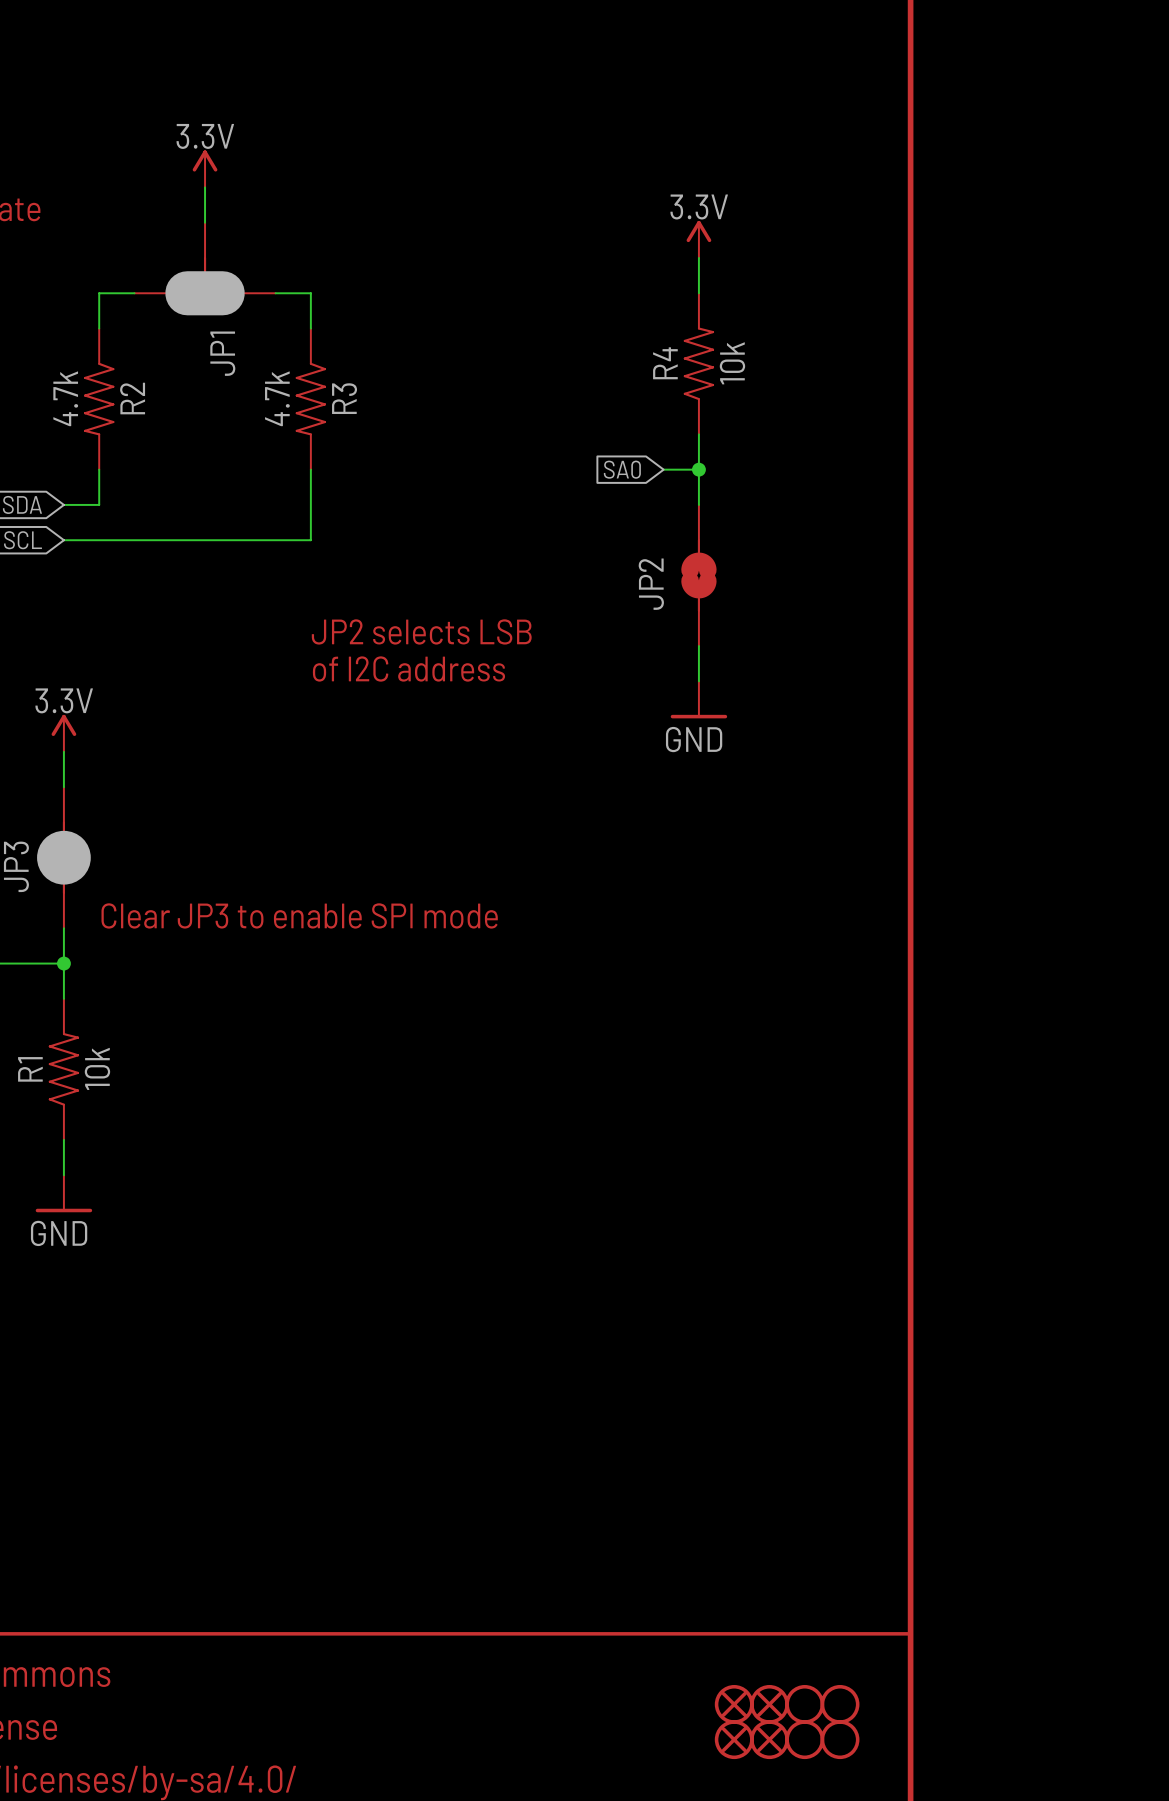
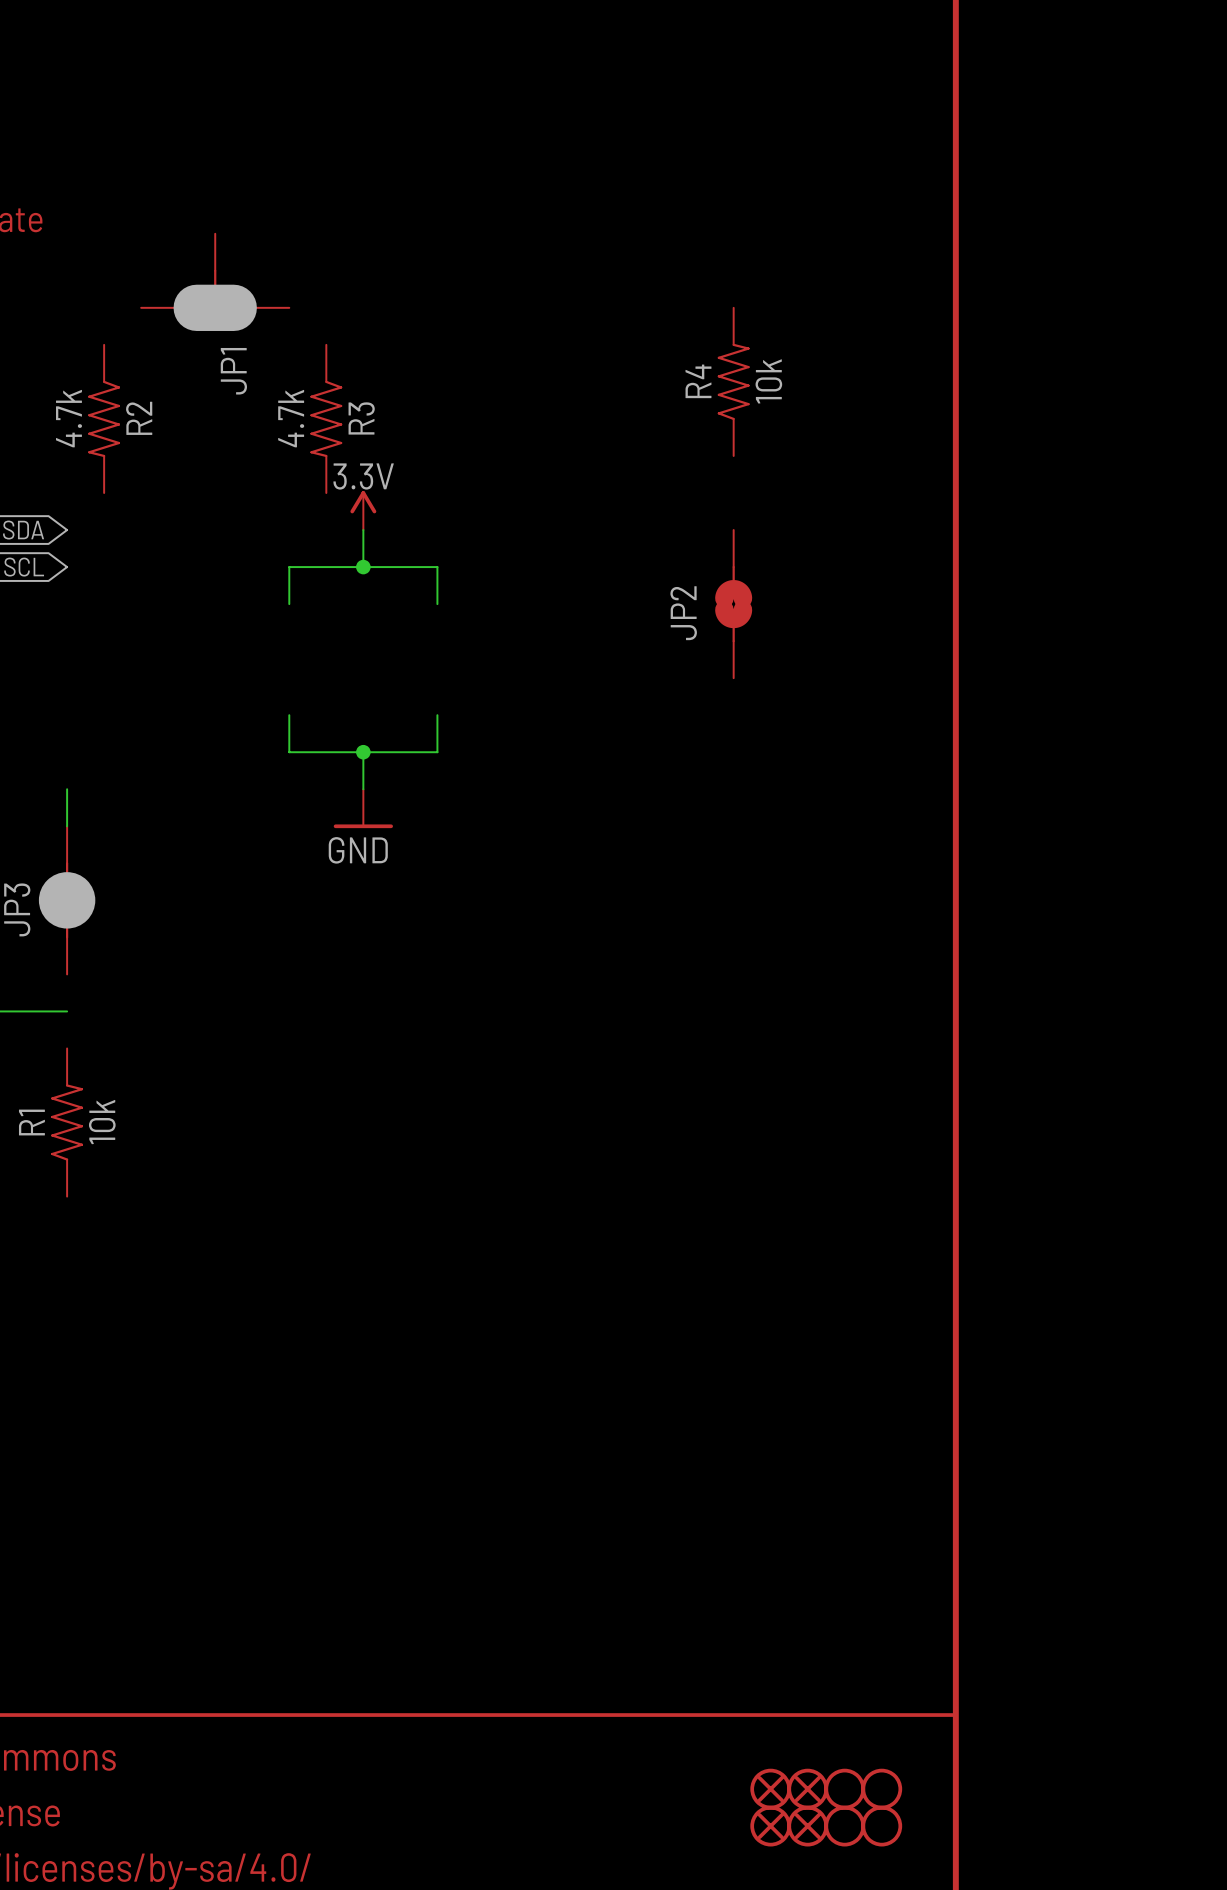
power symbol: 3.3V (205, 168) -> none
wire: (205, 187) (205, 222) -> none
power symbol: 3.3V (698, 239) -> none
wire: (698, 257) (698, 293) -> none
wire: (134, 293) (99, 293) (99, 328) -> none
wire: (275, 293) (310, 293) (310, 328) -> none
wire: (698, 434) (698, 504) -> none
wire: (99, 469) (99, 504) (63, 504) -> none
wire: (310, 469) (310, 540) -> (437, 604) (437, 567) (326, 567)
global label: SA0 (622, 469) -> none
wire: (663, 469) (698, 469) -> none
junction: (698, 469) -> none
power symbol: none -> 3.3V (363, 510)
wire: none -> (363, 530) (363, 567)
wire: (63, 540) (275, 540) -> (289, 604) (289, 567)
junction: none -> (363, 567)
text: JP2 selects LSB (421, 631) -> none
wire: (698, 646) (698, 681) -> none
text: of I2C address (408, 669) -> none
wire: none -> (289, 715) (289, 752) (437, 752) (437, 715)
power symbol: GND (698, 699) -> none
wire: none -> (363, 752) (363, 789)
junction: none -> (363, 752)
power symbol: 3.3V (63, 733) -> none
power symbol: none -> GND (363, 808)
text: Clear JP3 to enable SPI mode (299, 915) -> none
wire: (63, 928) (63, 998) -> none
junction: (63, 963) -> none
wire: (63, 1139) (63, 1175) -> none
power symbol: GND (63, 1193) -> none

